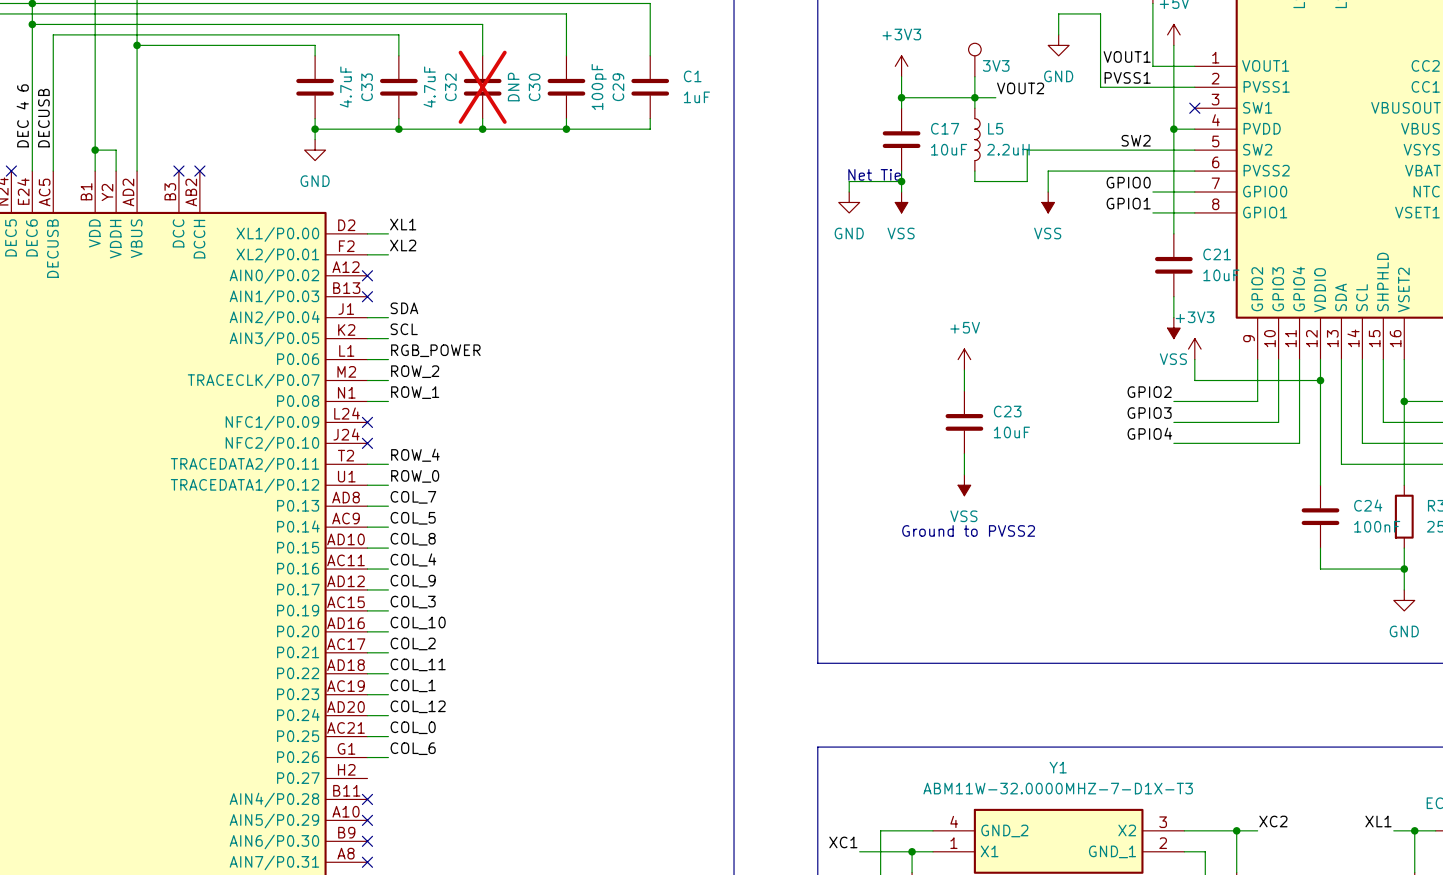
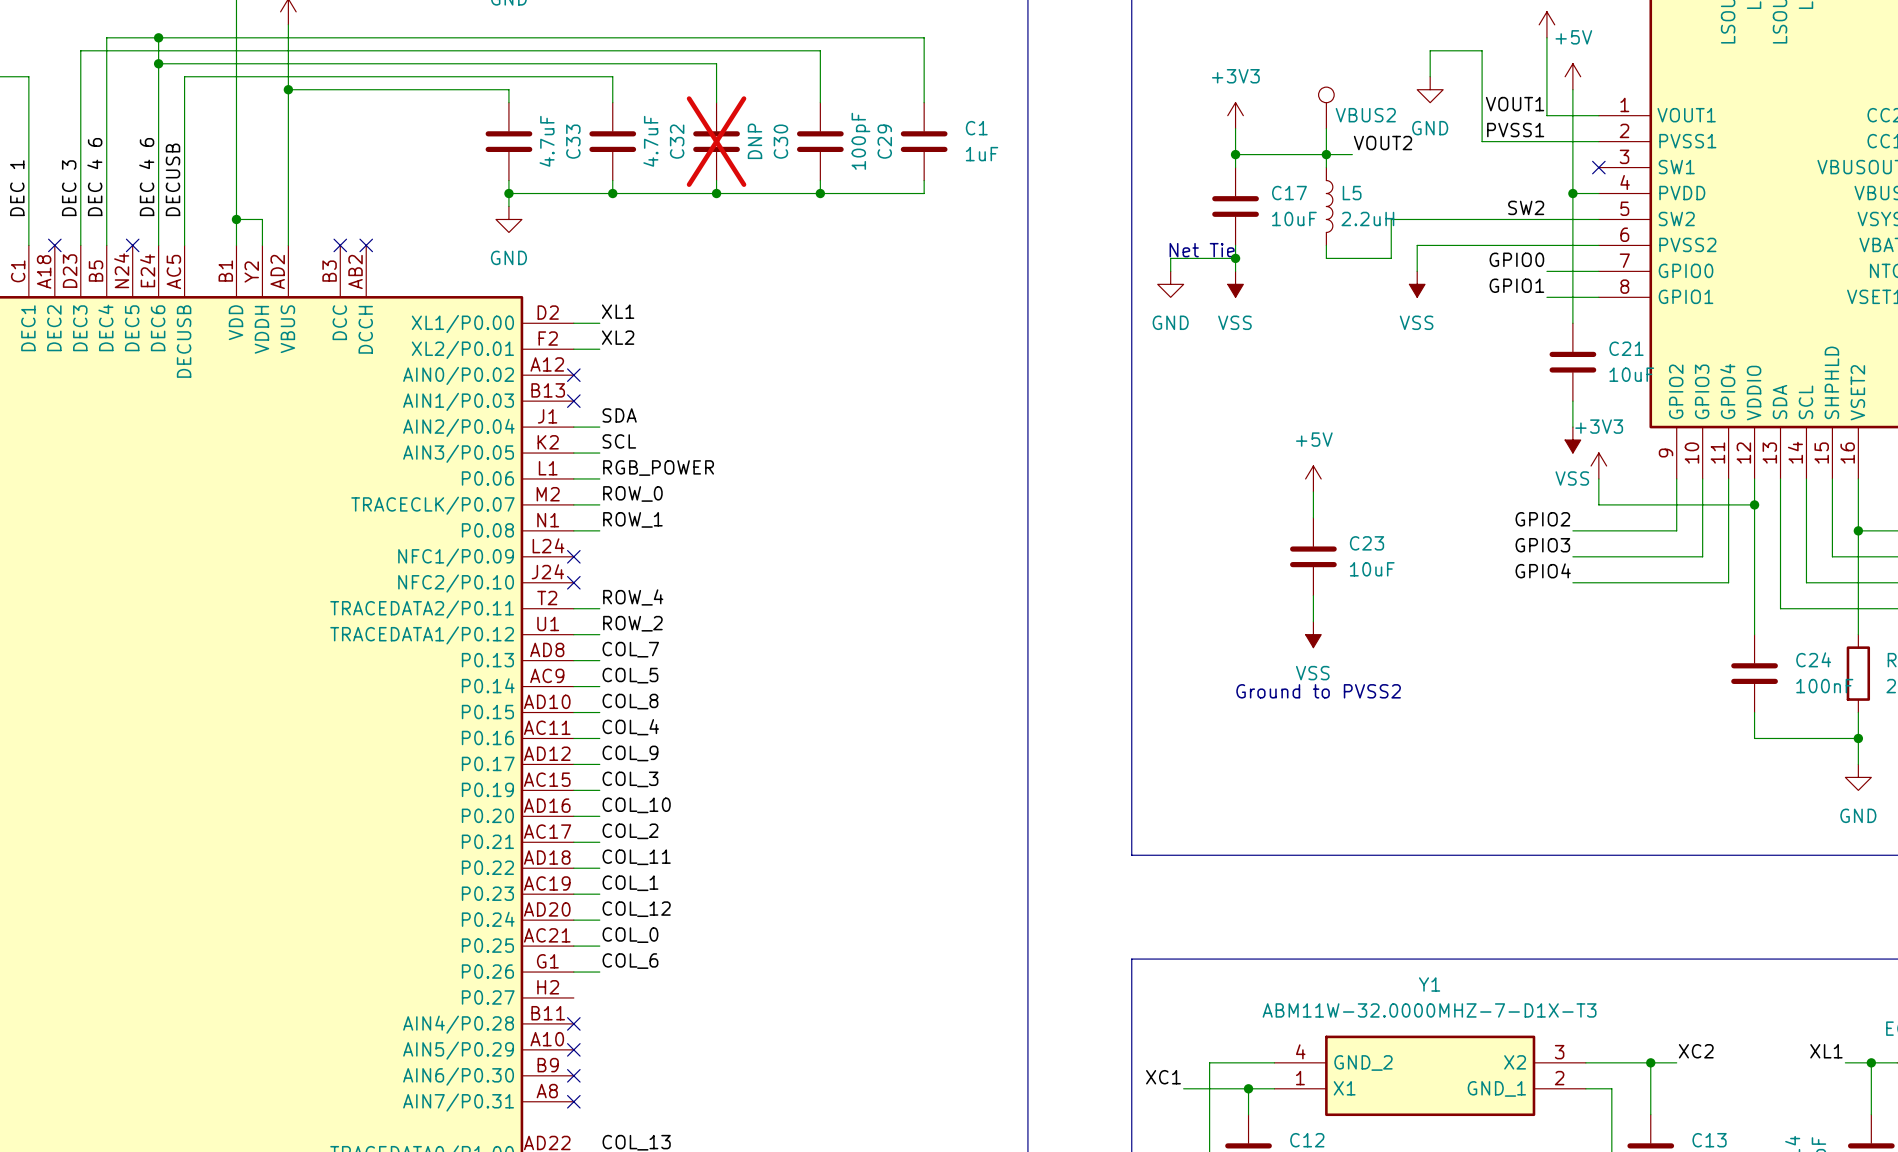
3V3 name: 3V3 (996, 65) -> VBUS2 (1365, 115)
label: ROW_2 (415, 371) -> ROW_0 (632, 493)
label: ROW_0 (415, 476) -> ROW_2 (632, 623)

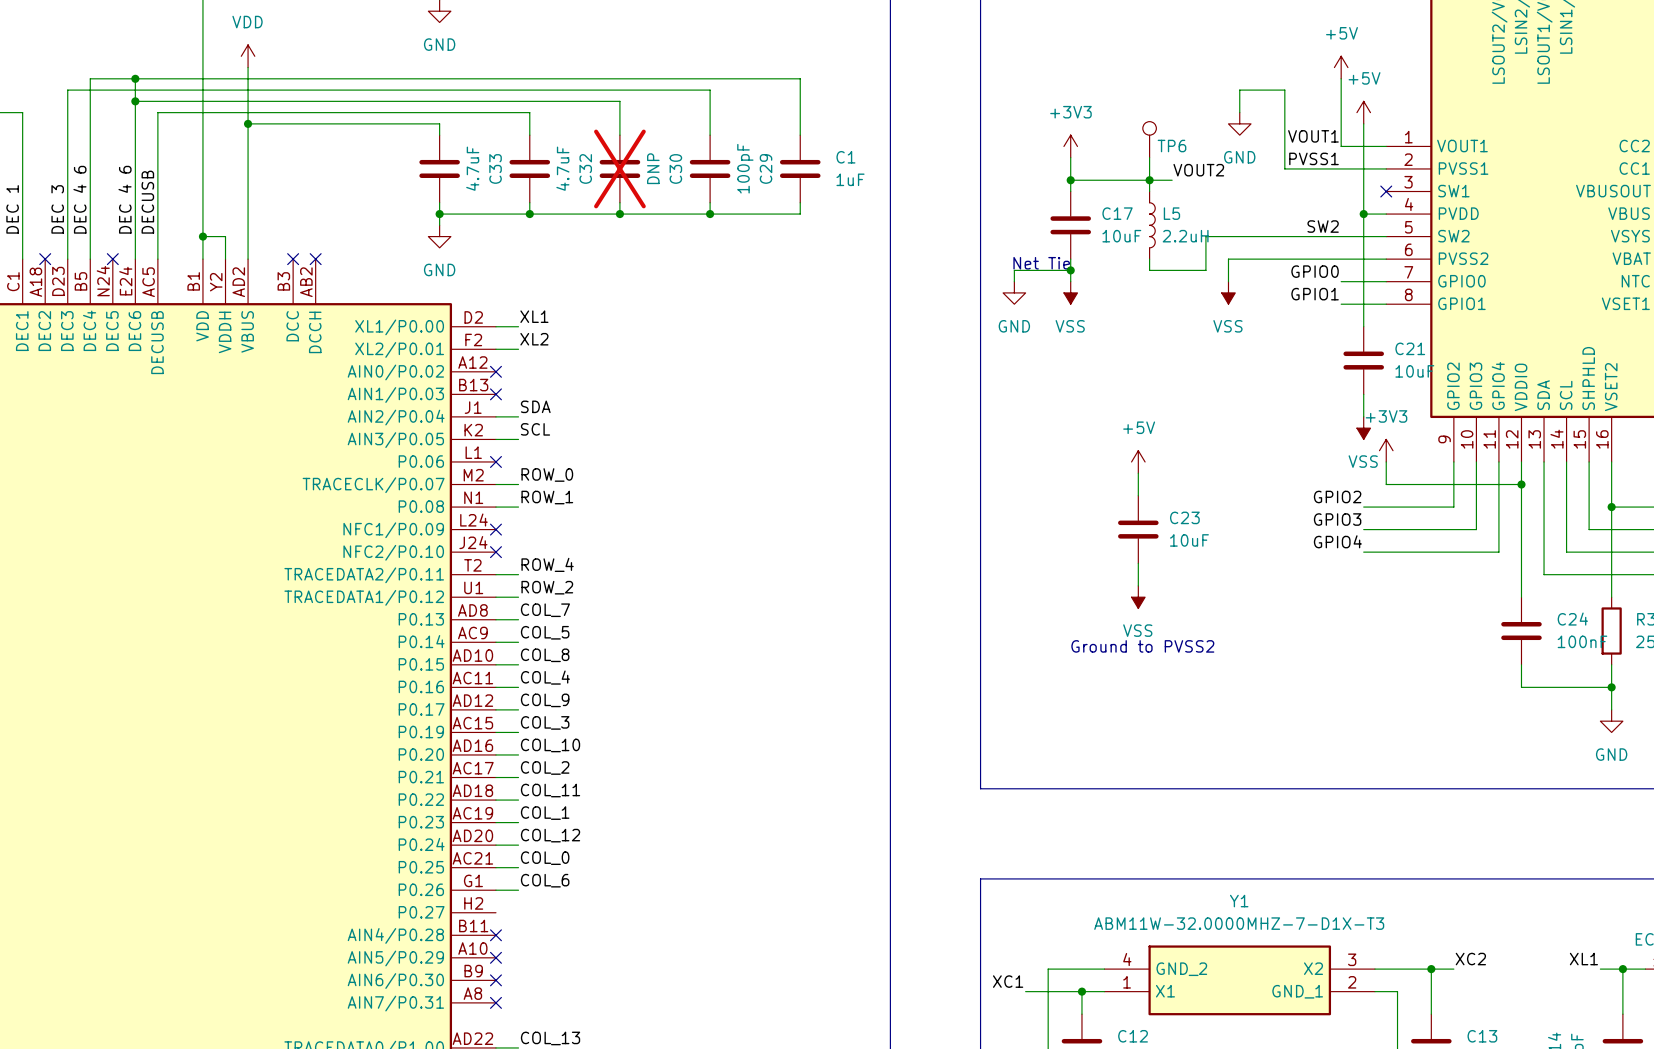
VBUS2 name: VBUS2 (1365, 115) -> TP6 (1172, 146)
label: RGB_POWER (658, 468) -> none
wire: (573, 478) (599, 478) -> none
no-connect mark: none -> (495, 461)

